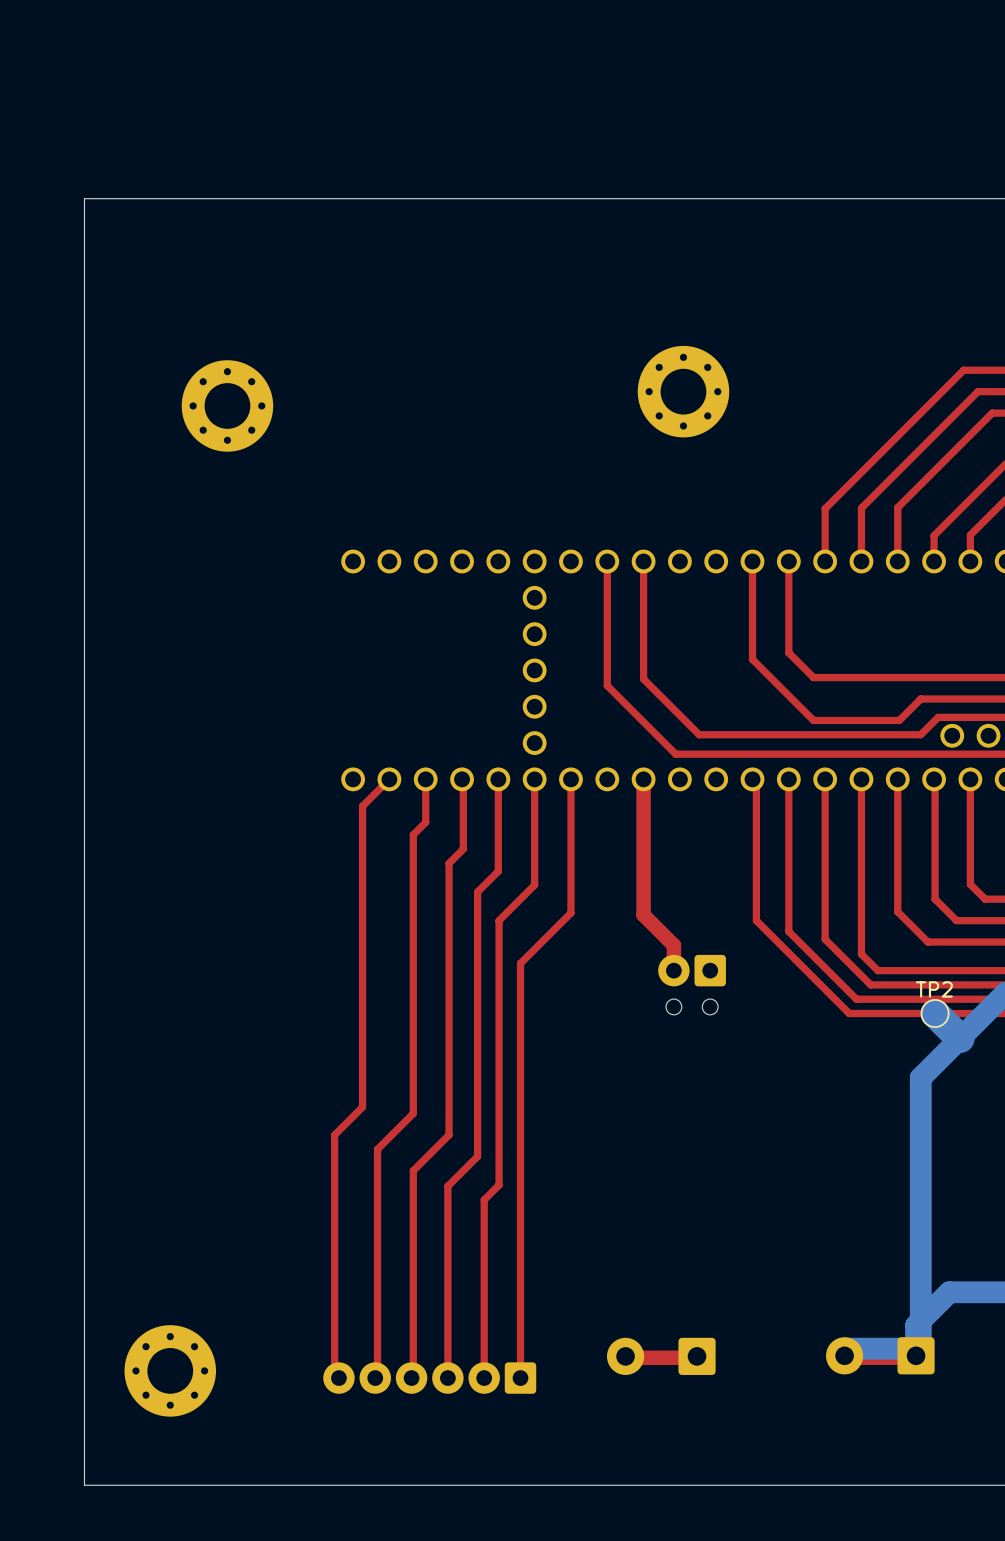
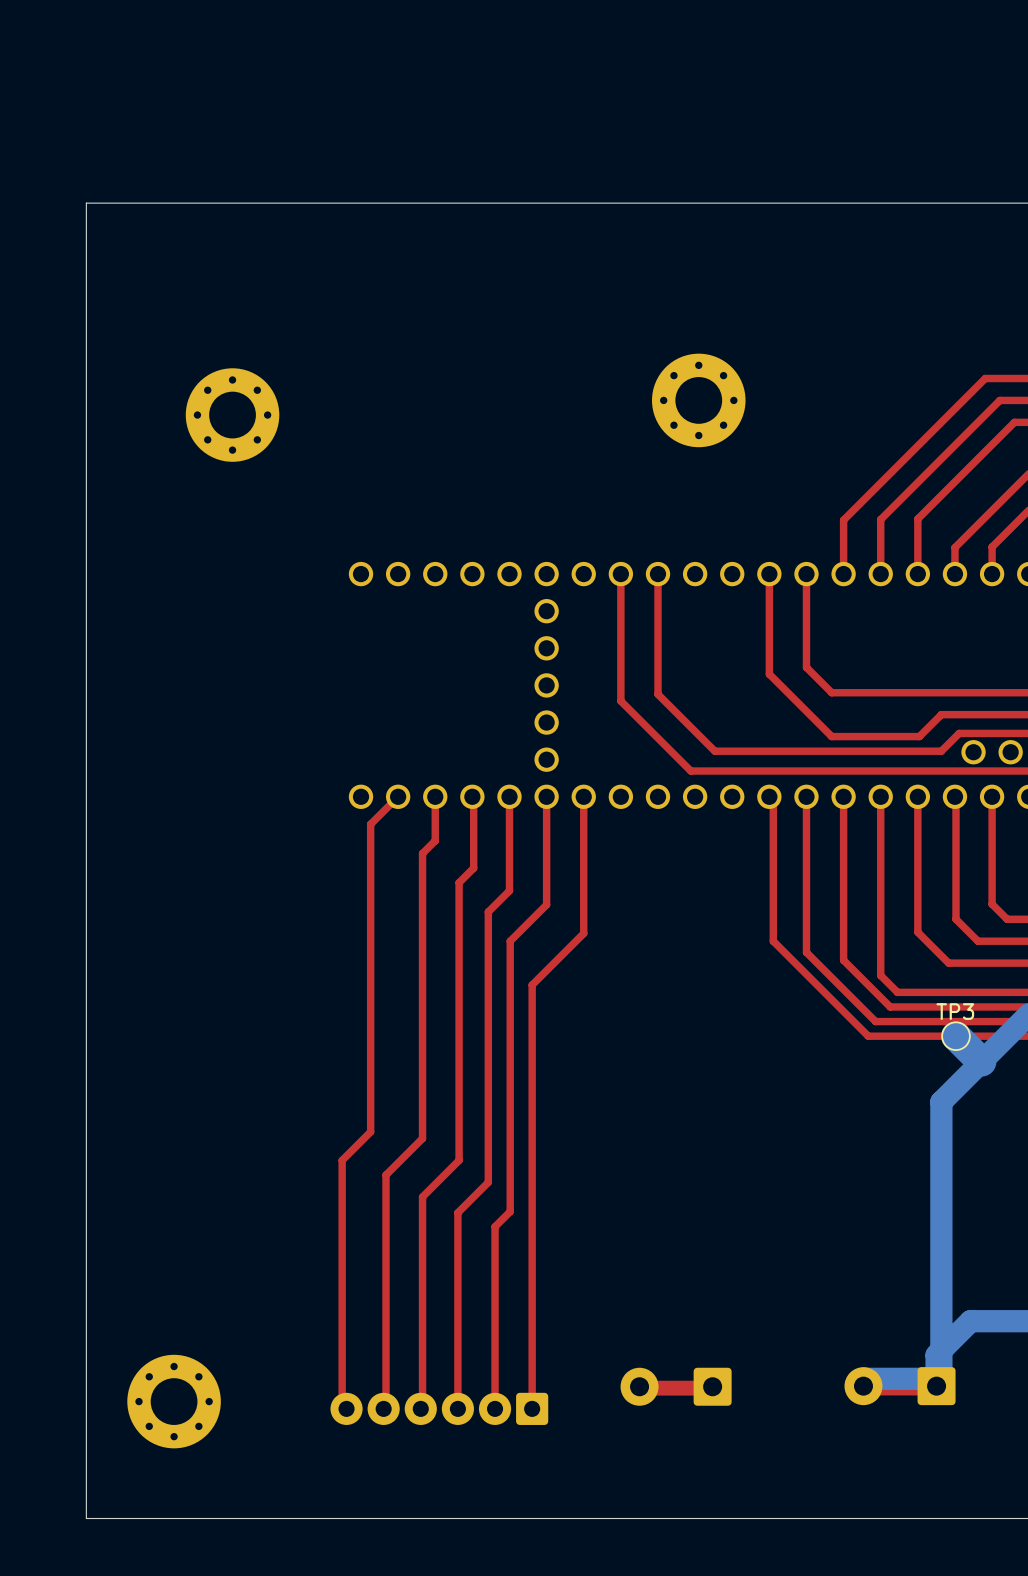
top track: (643, 779) (643, 915) (673, 945) (673, 970) -> none
part: (692, 984) -> none
TP2 name: TP2 (934, 989) -> TP3 (955, 1011)

